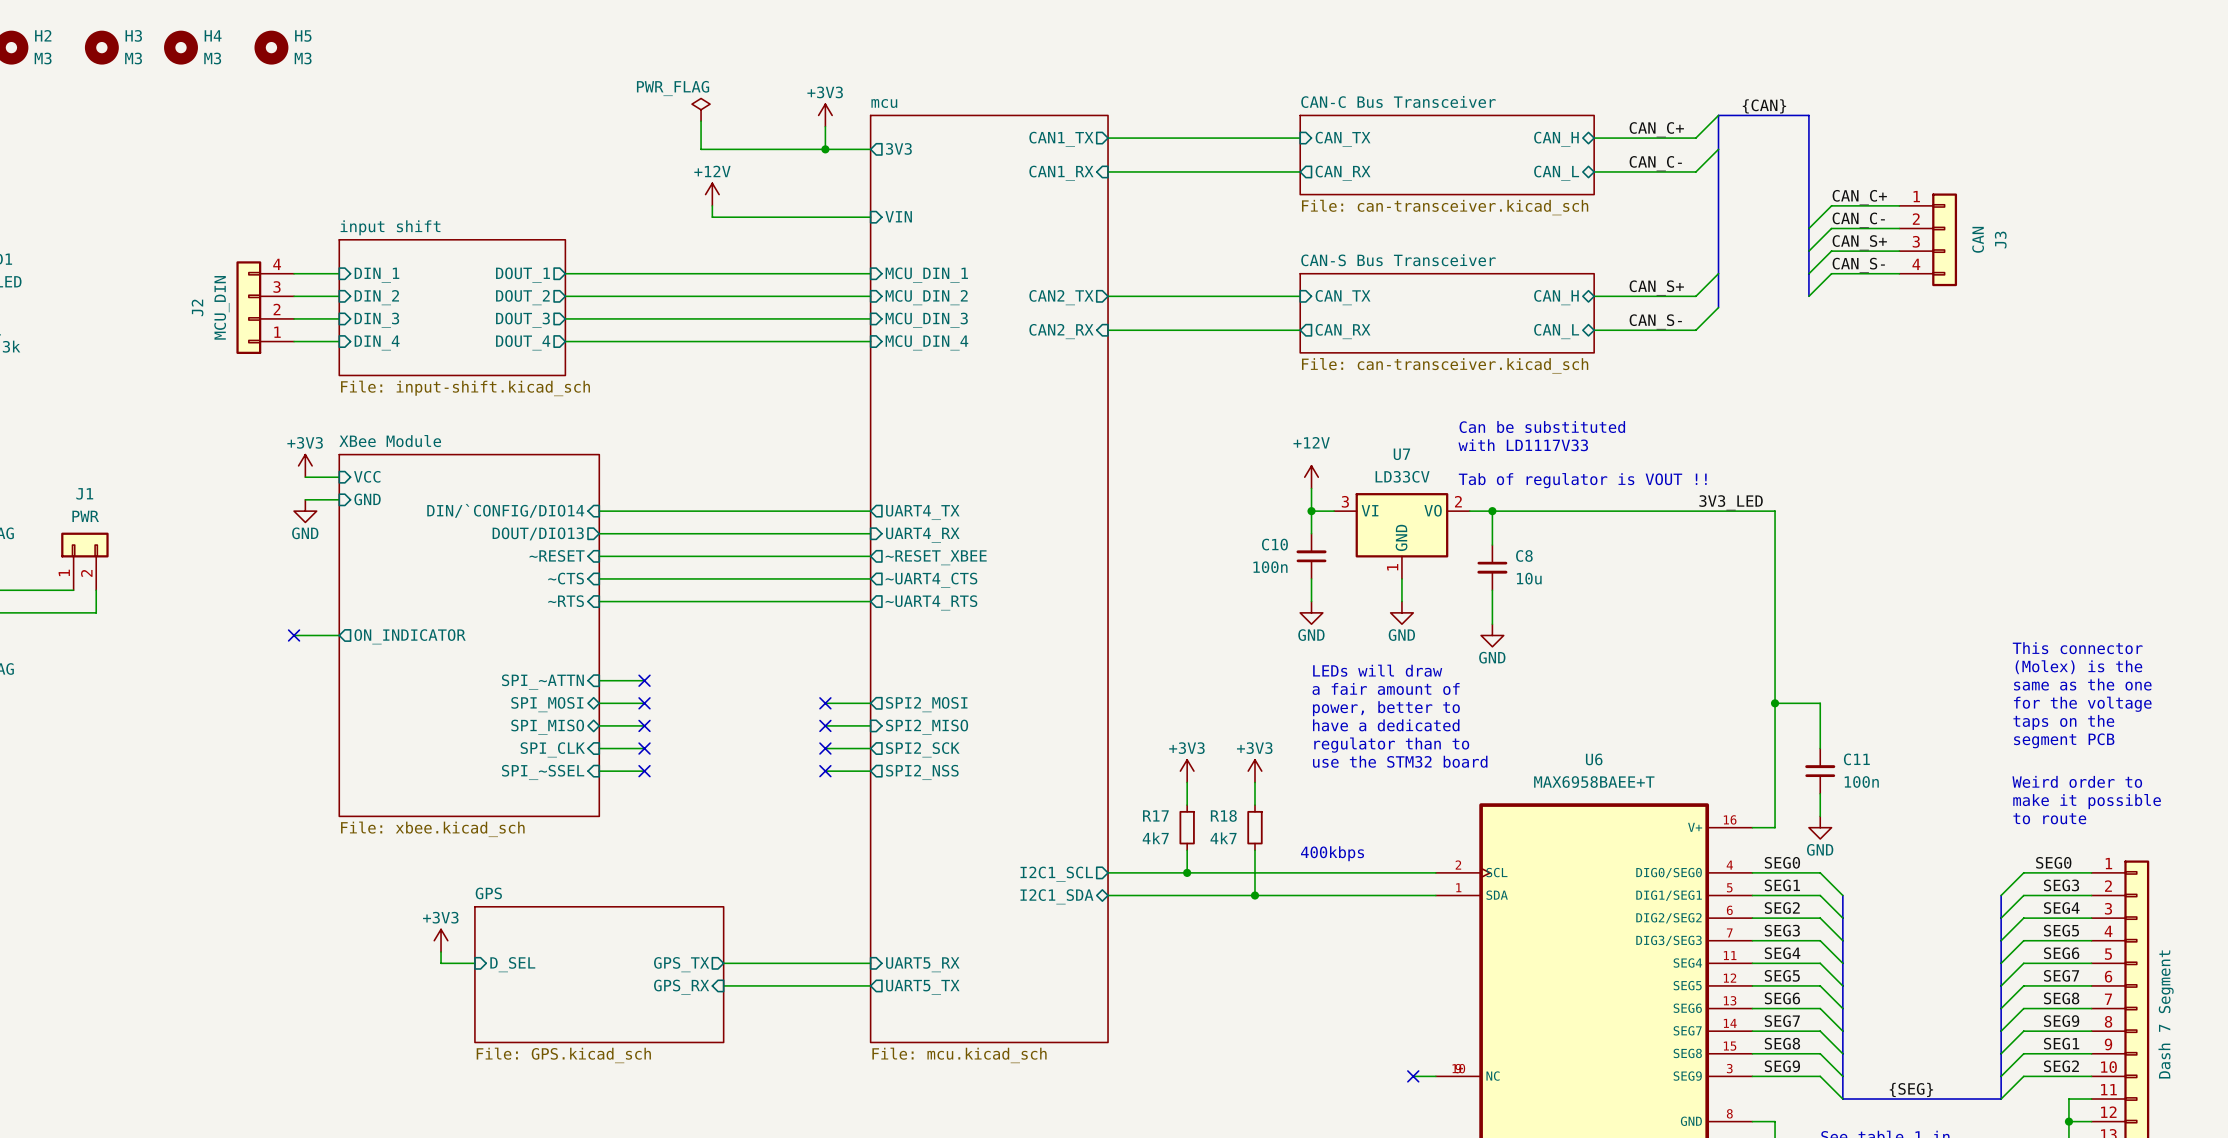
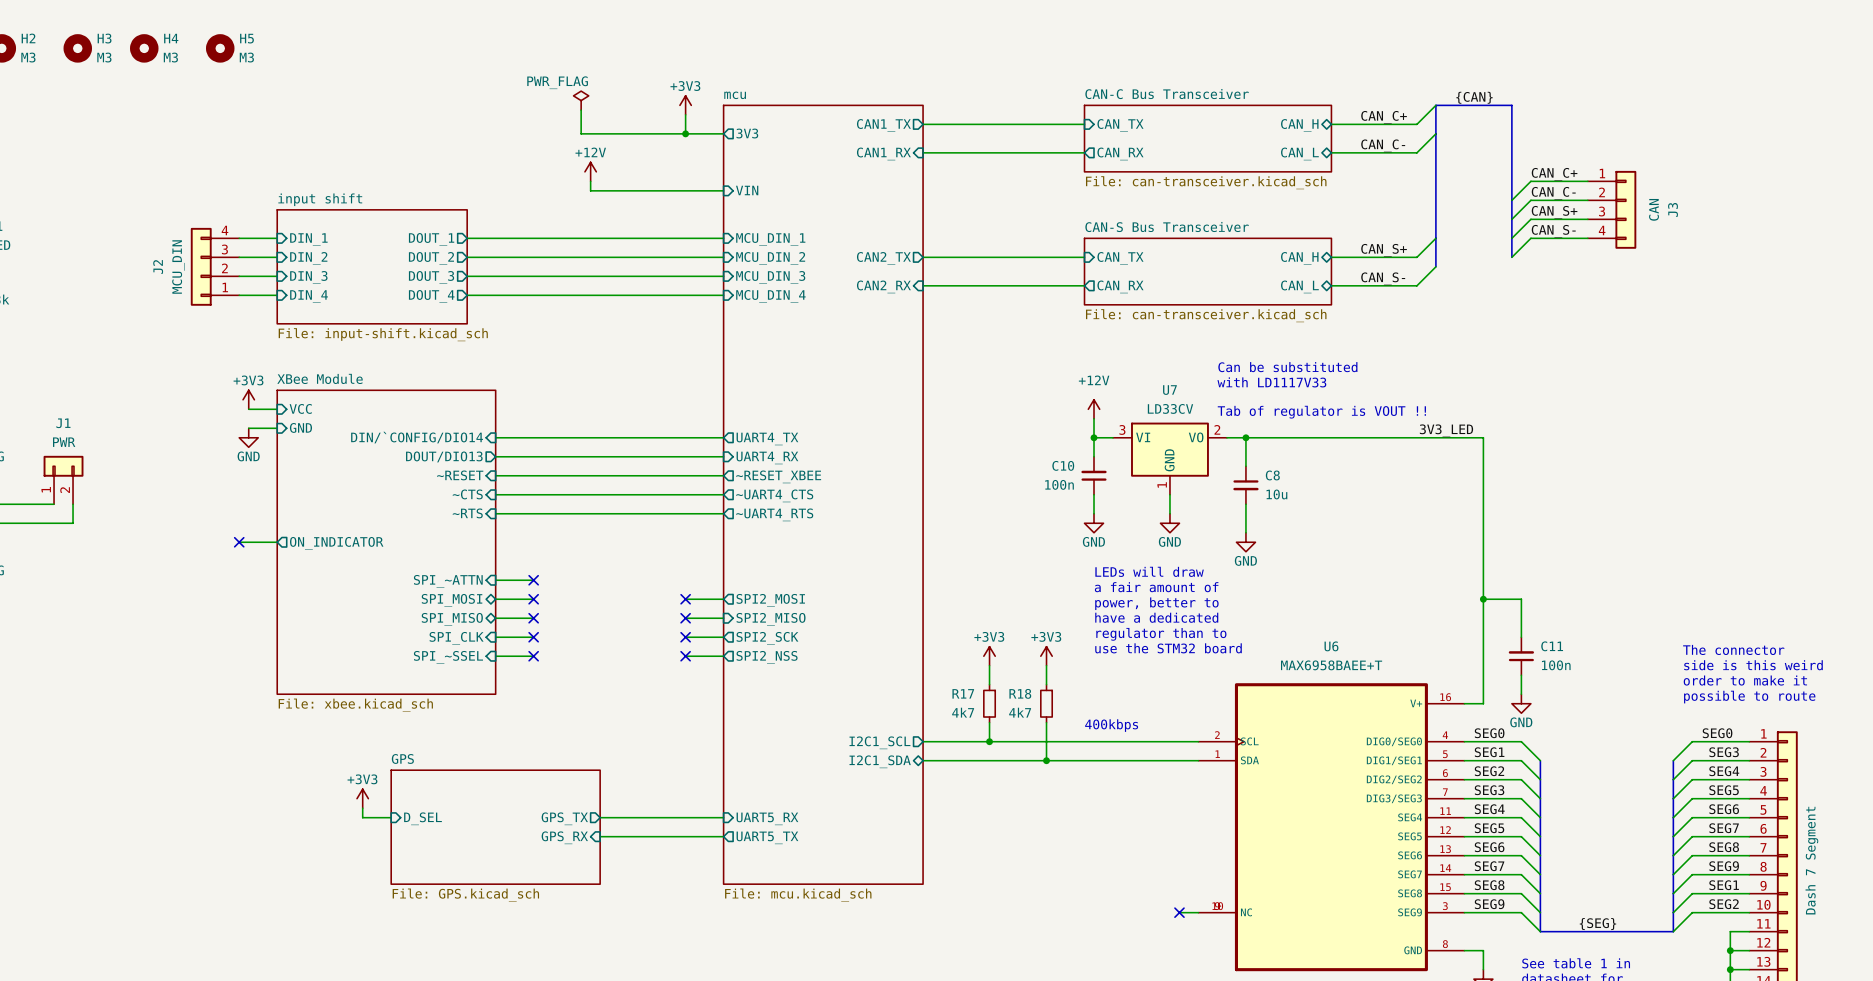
text: This connector (2077, 648) -> none
text: (Molex) is the (2078, 667) -> none
text: same as the one (2082, 684) -> none
text: for the voltage (2082, 704) -> none
text: taps on the (2063, 722) -> none
text: segment PCB (2064, 740) -> none
text: none -> The connector (1733, 649)
text: Weird order to (2077, 781) -> side is this weird (1753, 665)
text: make it possible (2087, 801) -> order to make it (1745, 680)
text: to route (2049, 818) -> possible to route (1749, 697)

